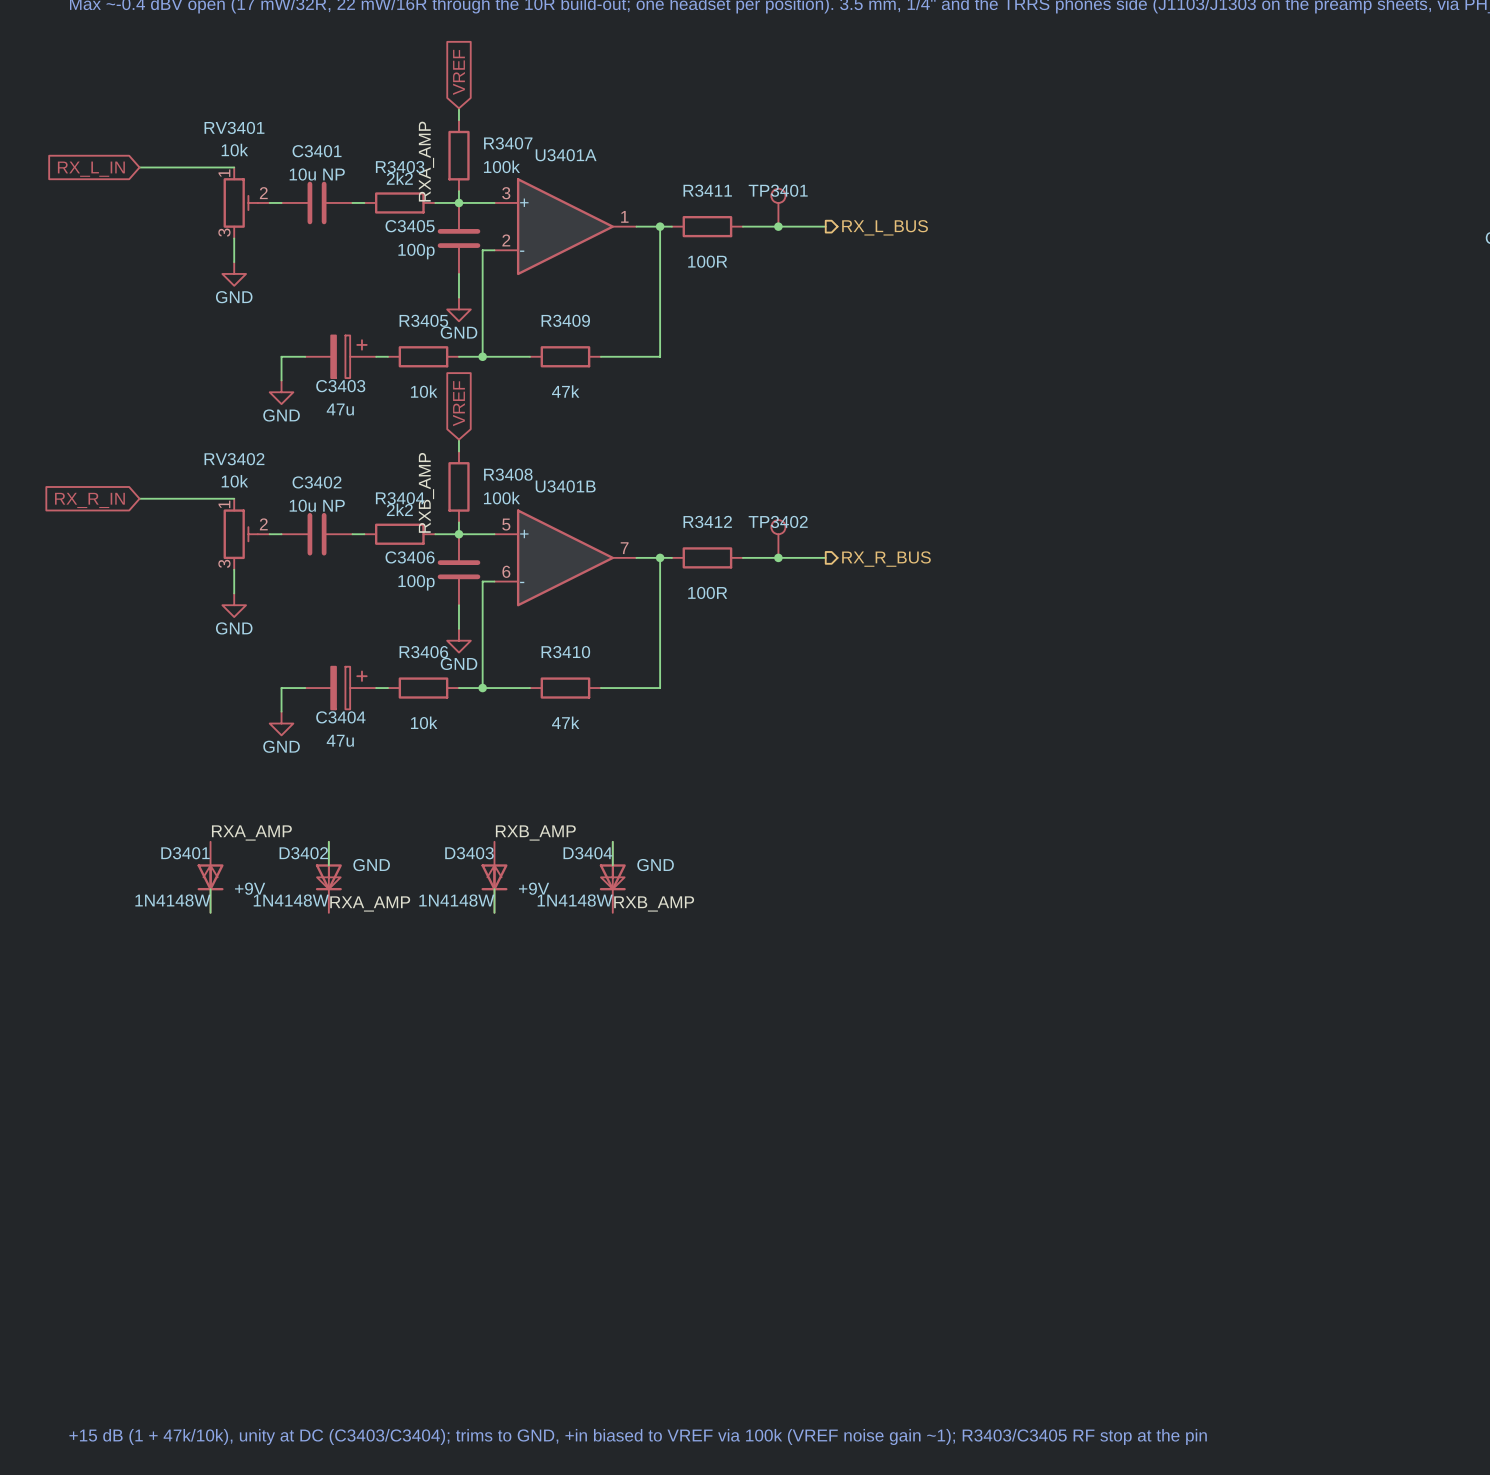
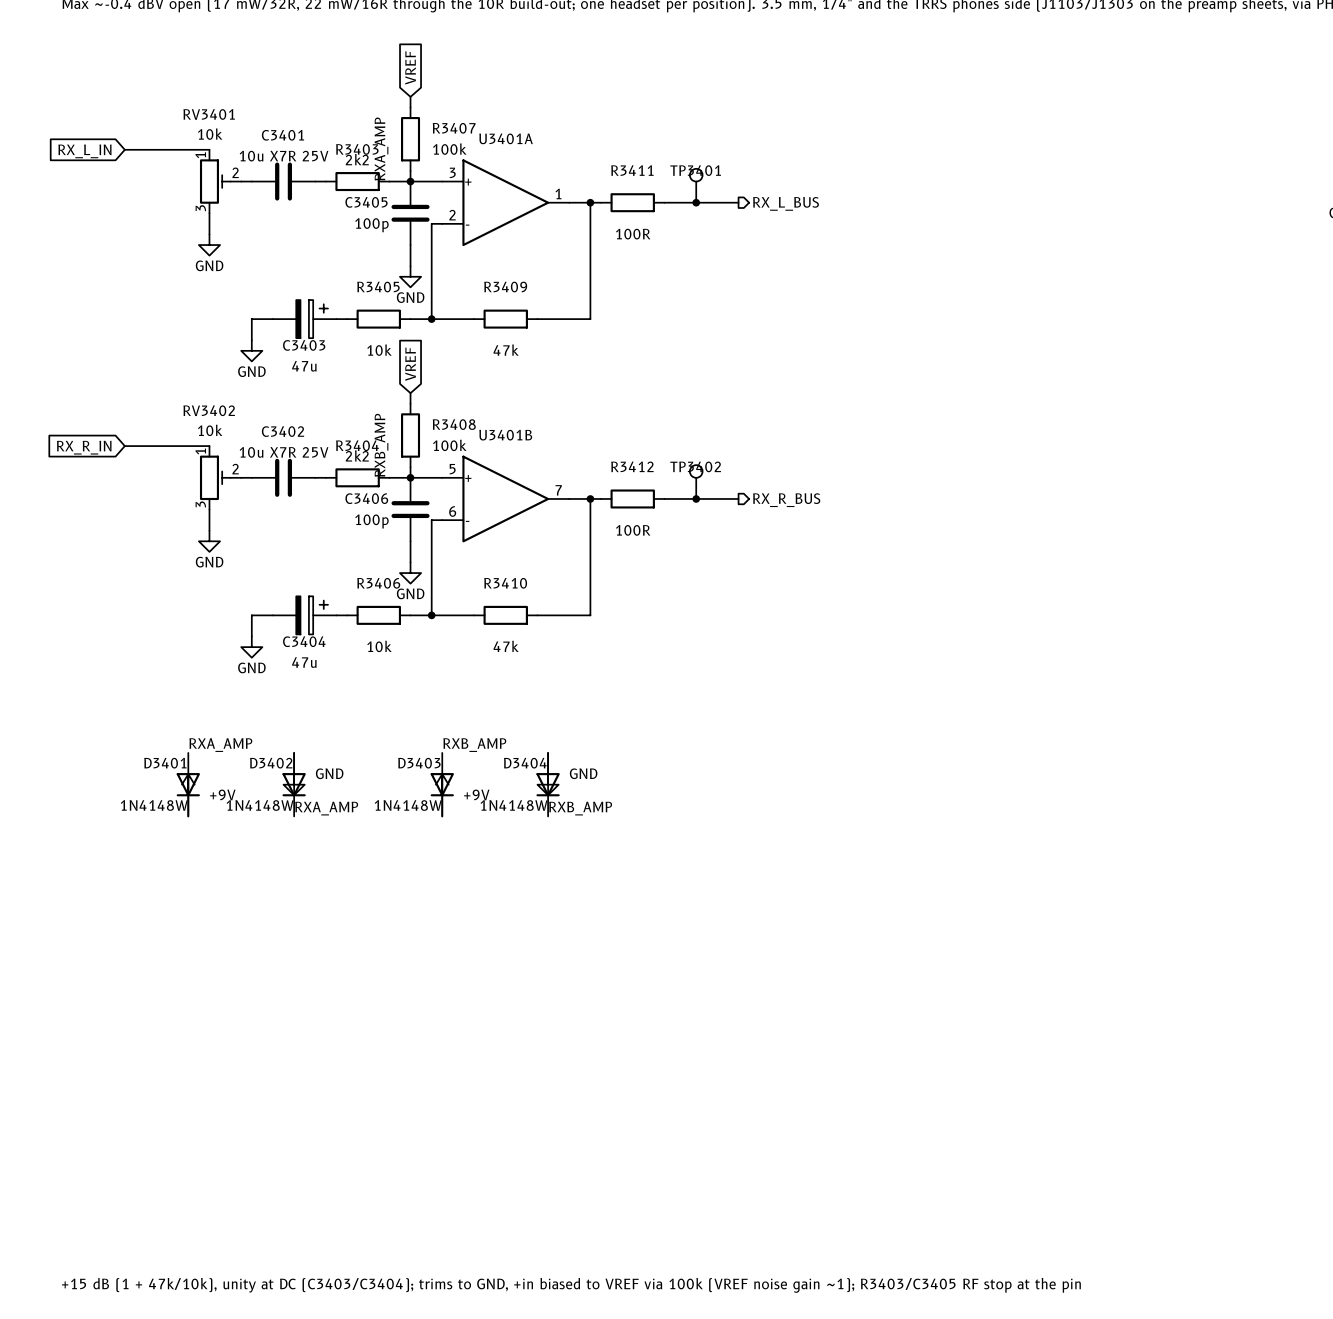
C3401 value: 10u NP (317, 174) -> 10u X7R 25V (284, 156)
C3402 value: 10u NP (317, 505) -> 10u X7R 25V (284, 452)

